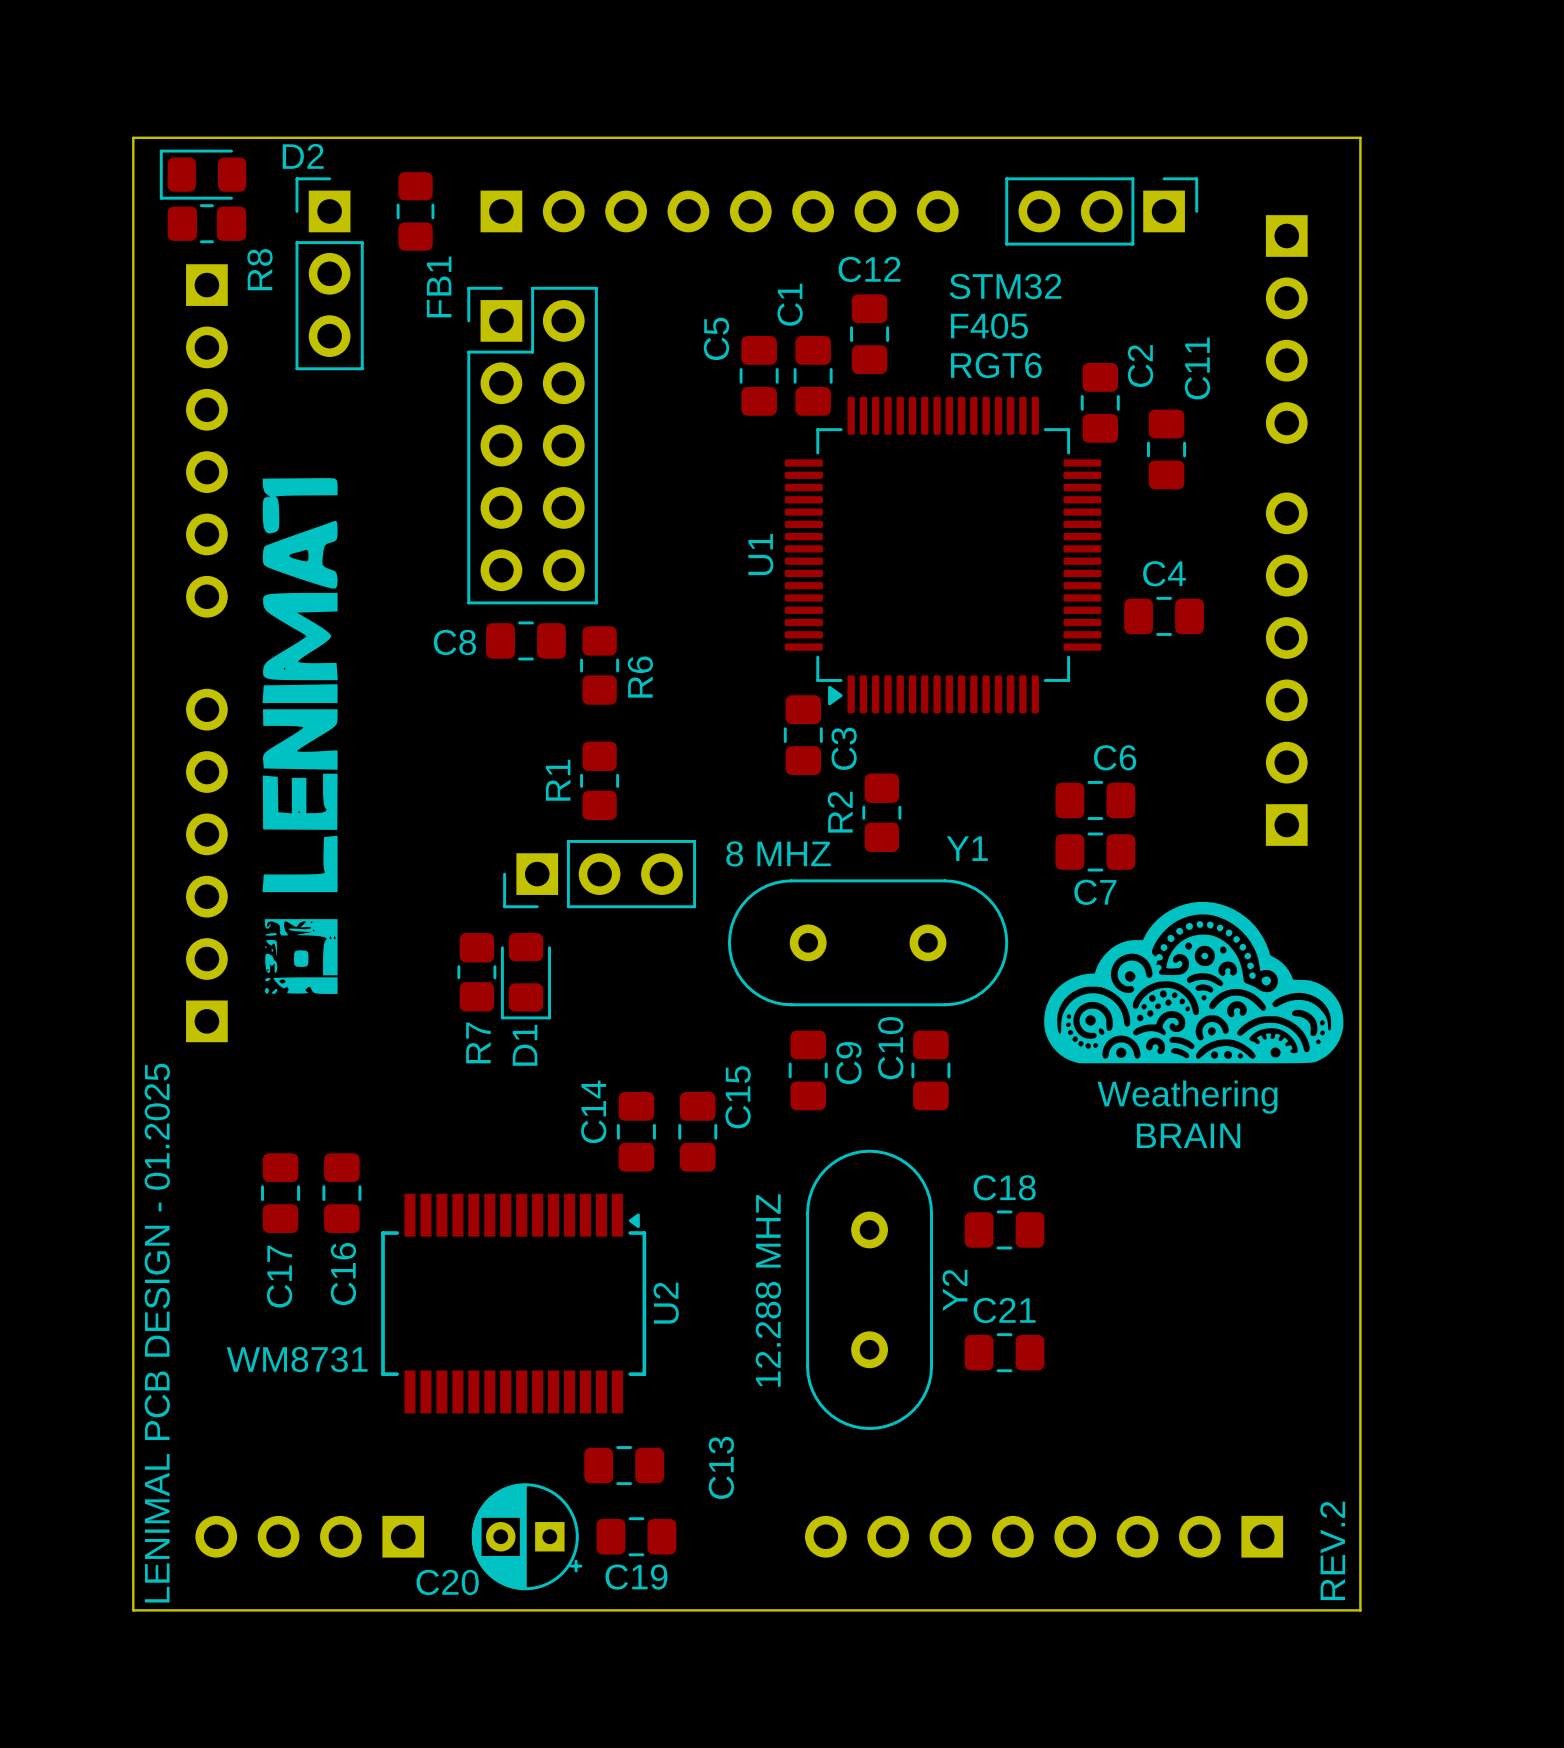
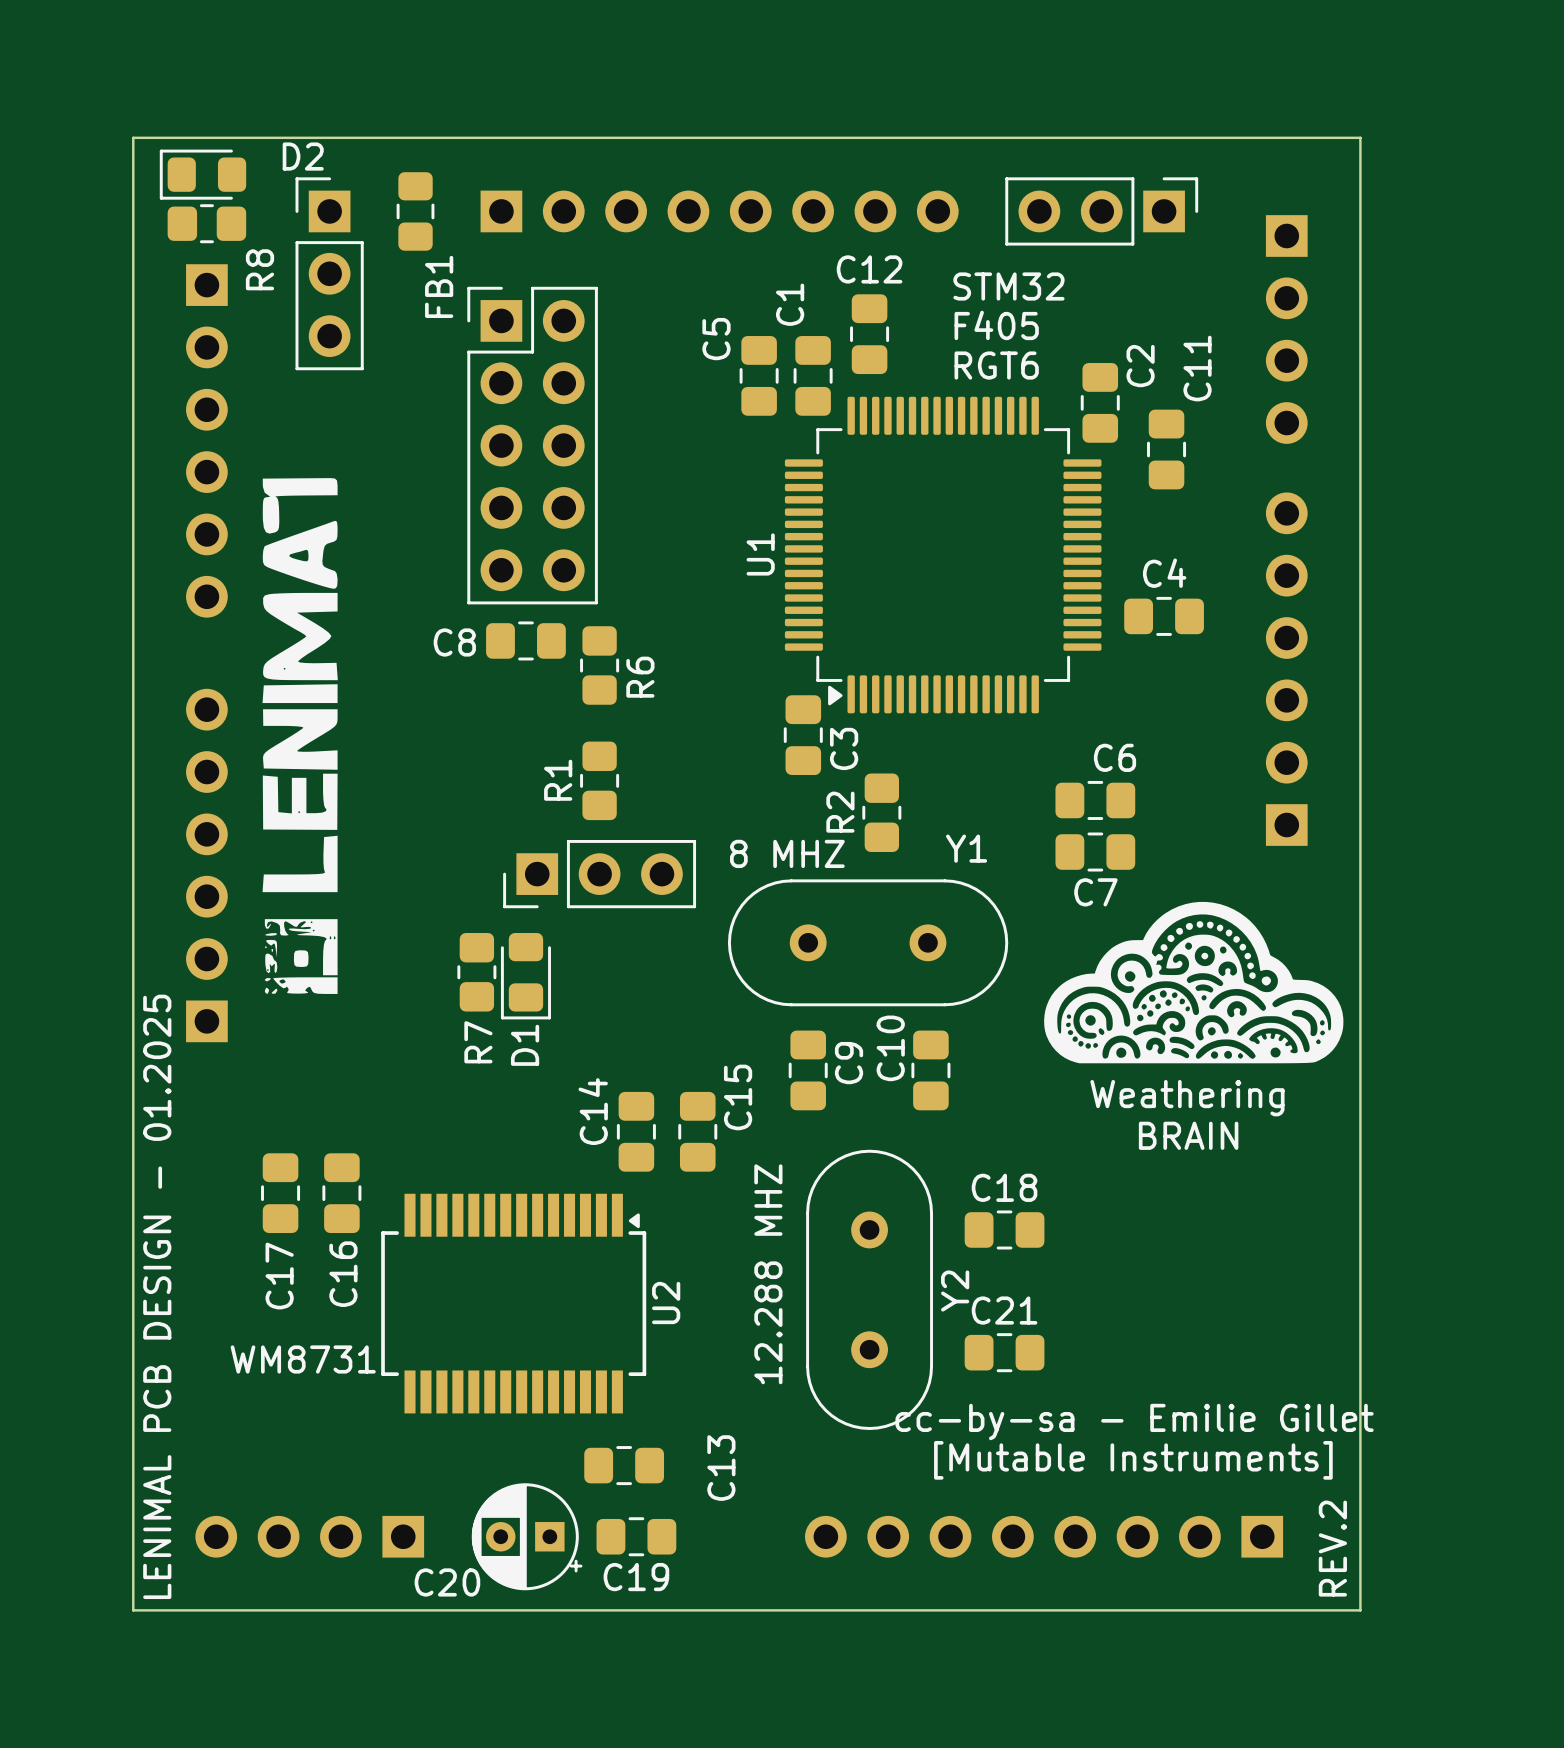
text: none -> cc-by-sa - Emilie Gillet (1134, 1422)
text: none -> [Mutable Instruments] (1133, 1460)

